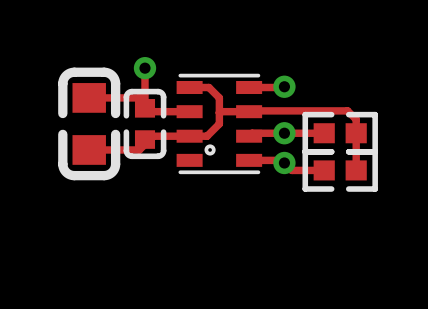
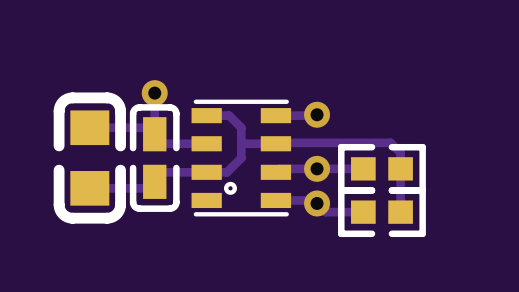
part footprint: [123, 88, 167, 160] -> [129, 104, 180, 212]

